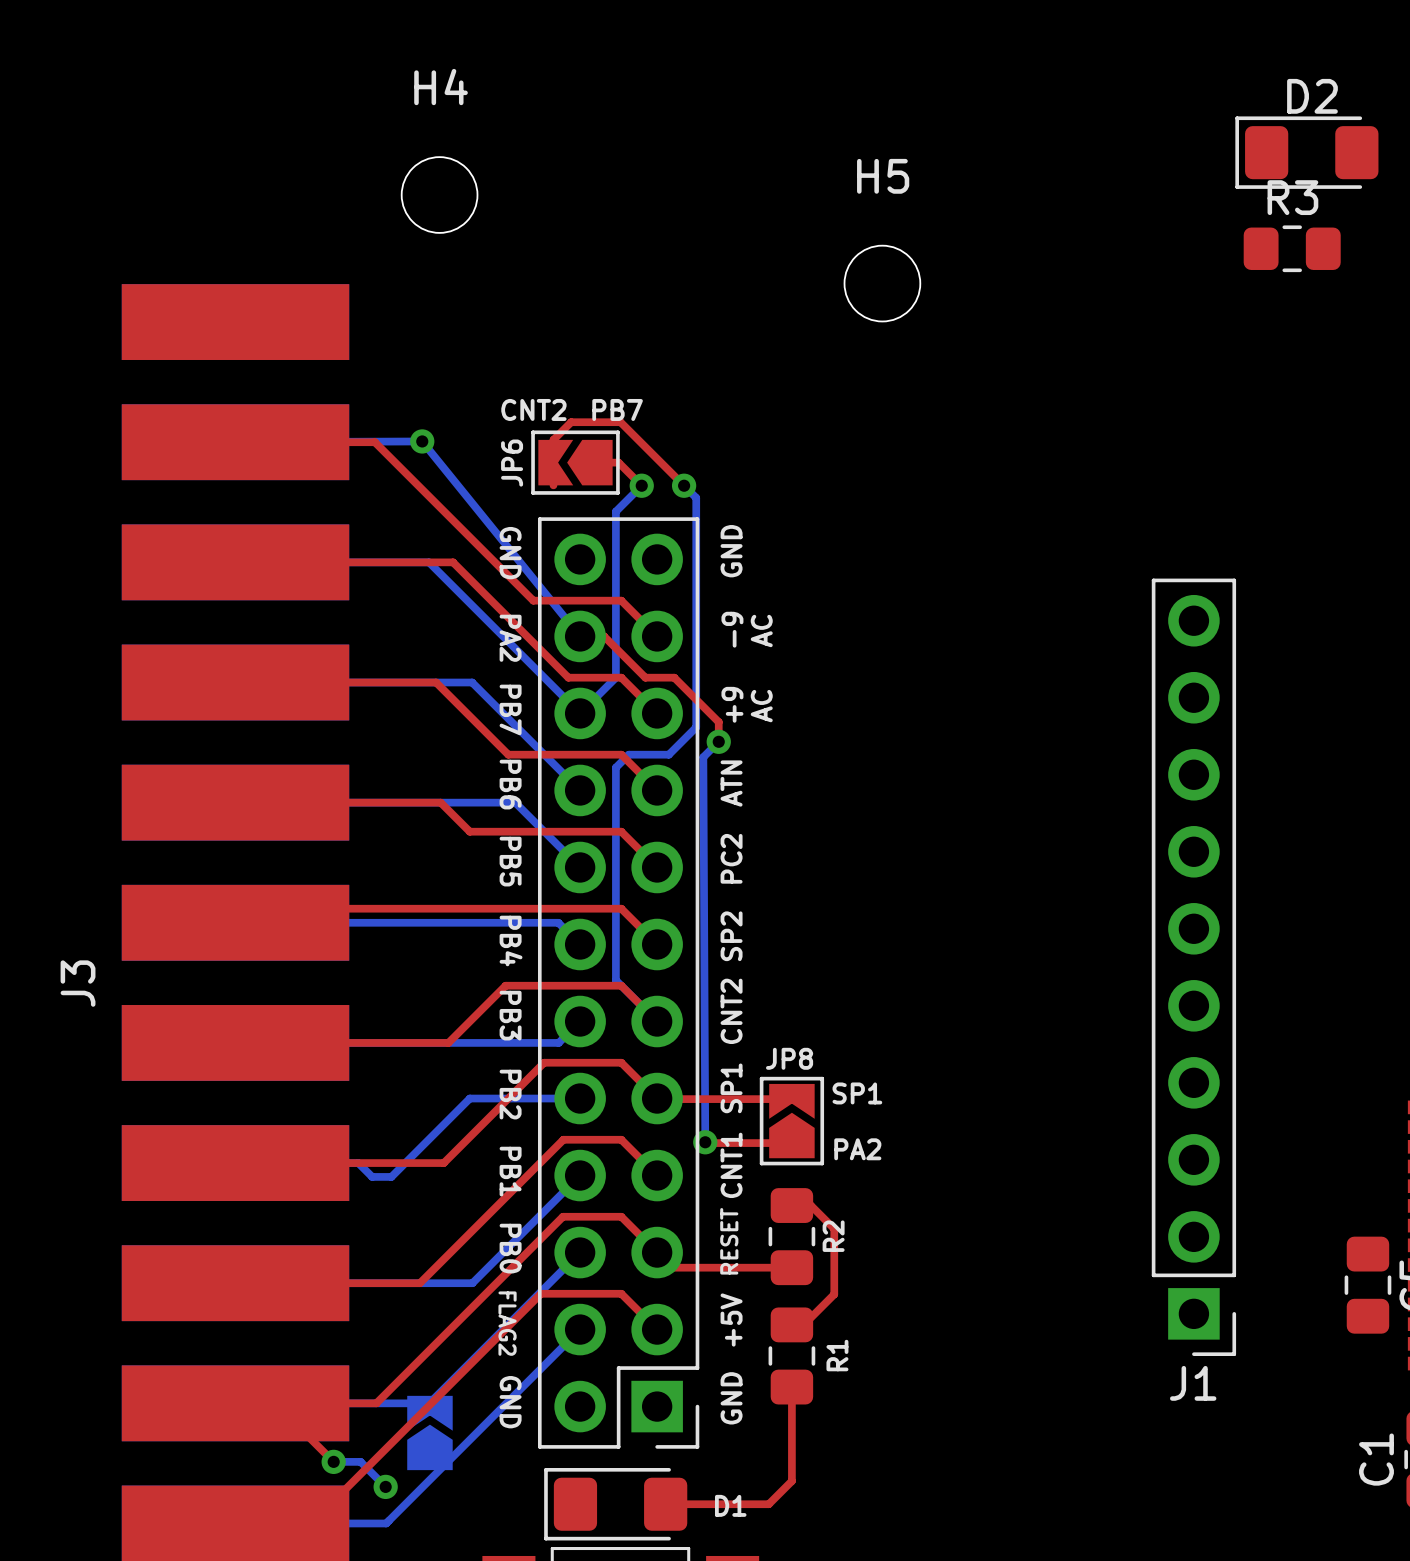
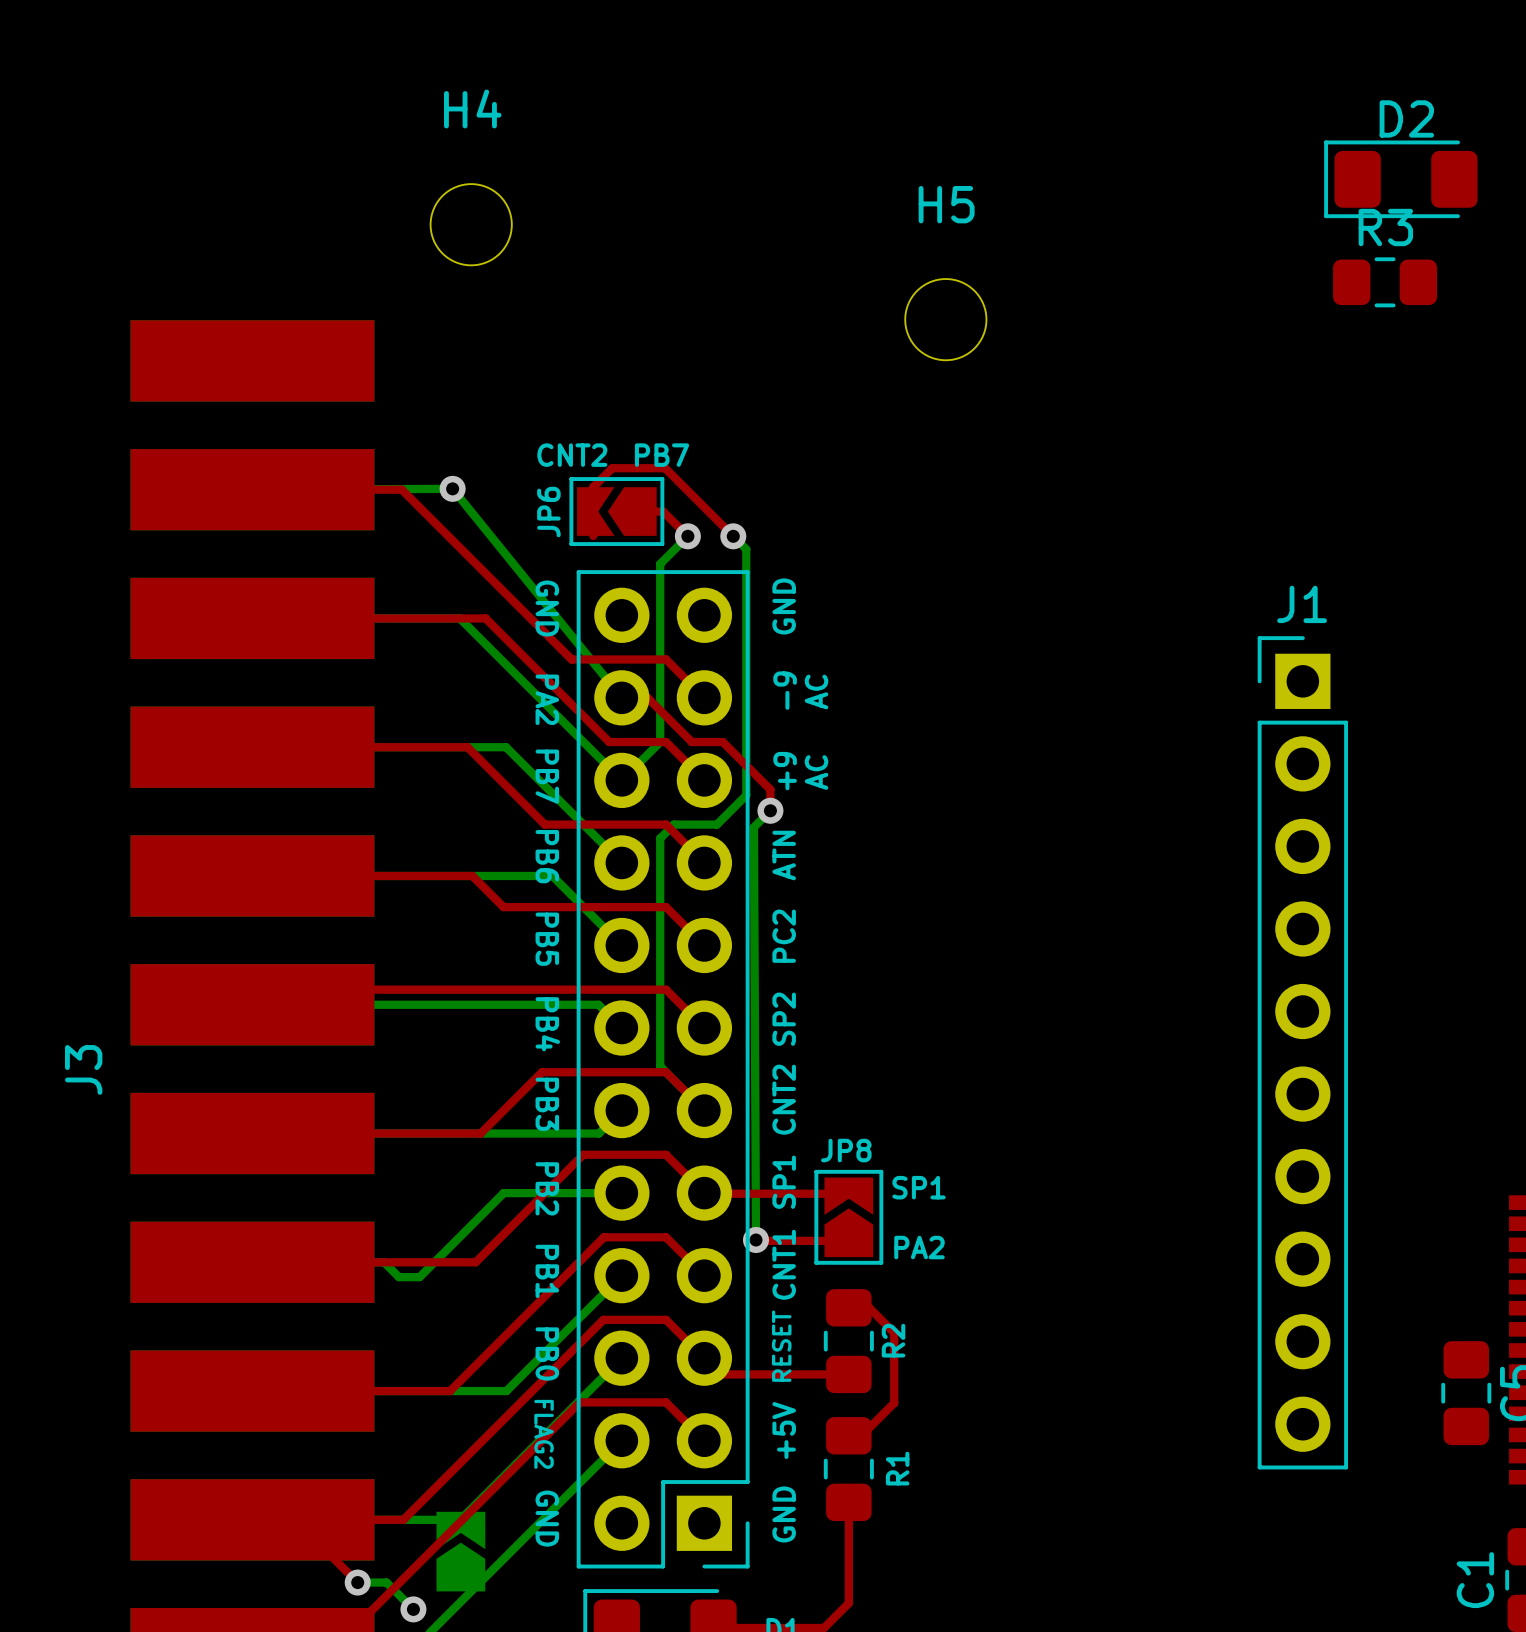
J1 rotation: 0° (1193, 967) -> 180° (1302, 1052)

